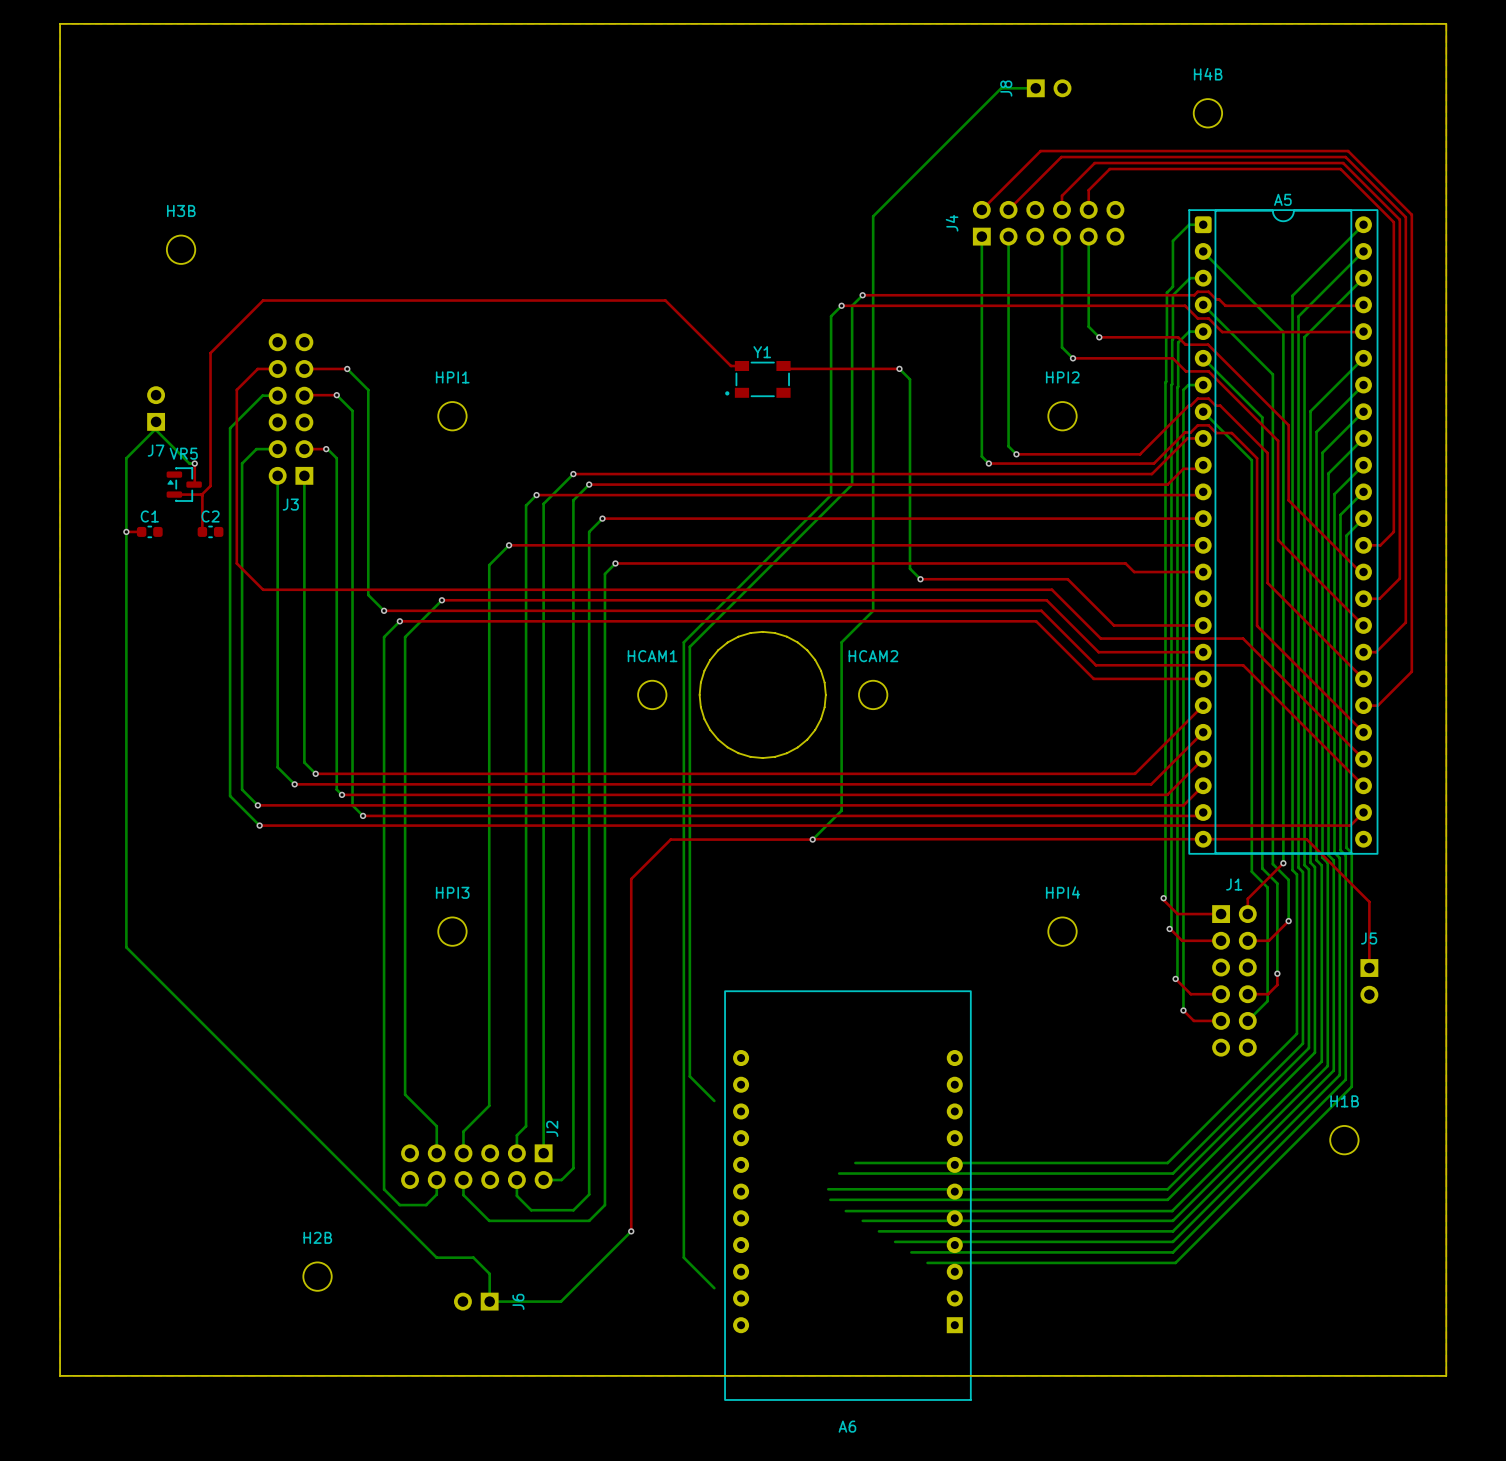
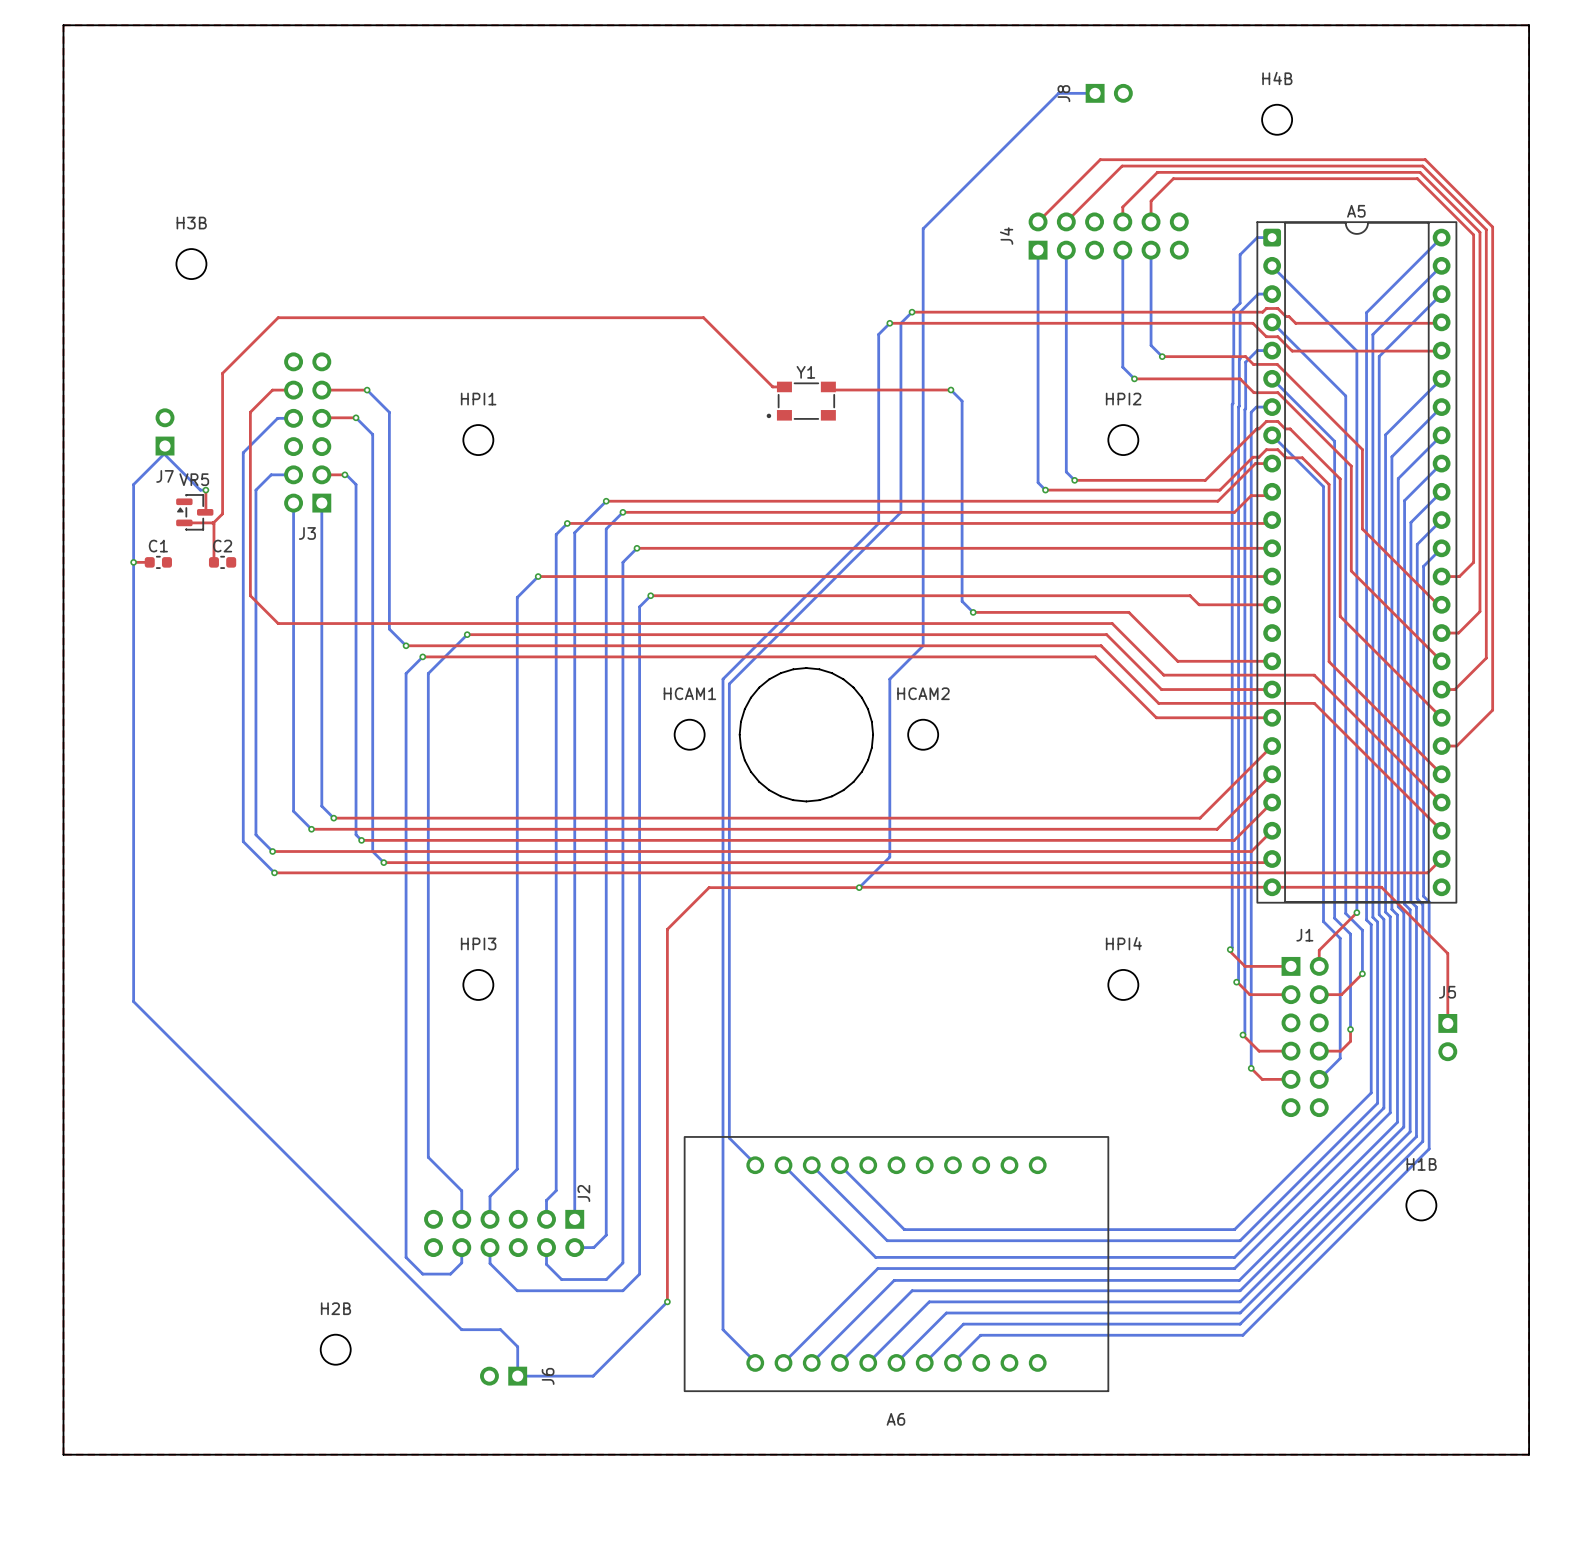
A6 footprint: [724, 990, 972, 1401] -> [683, 1136, 1110, 1393]
bottom track: none -> (783, 1165) (875, 1257)
bottom track: none -> (811, 1165) (887, 1240)
bottom track: none -> (839, 1165) (904, 1229)
bottom track: none -> (877, 1268) (783, 1362)
bottom track: none -> (894, 1280) (811, 1362)
bottom track: none -> (912, 1290) (839, 1362)
bottom track: none -> (929, 1301) (868, 1362)
bottom track: none -> (946, 1313) (896, 1362)
bottom track: none -> (963, 1324) (924, 1362)
bottom track: none -> (980, 1335) (952, 1362)
A6 name position: A6 (847, 1426) -> A6 (895, 1419)

